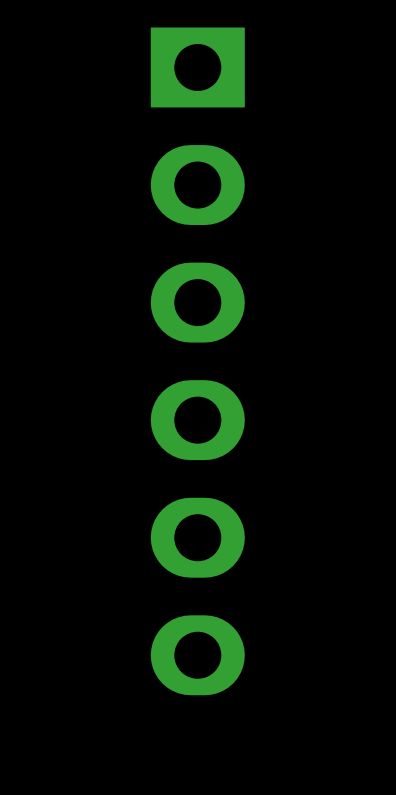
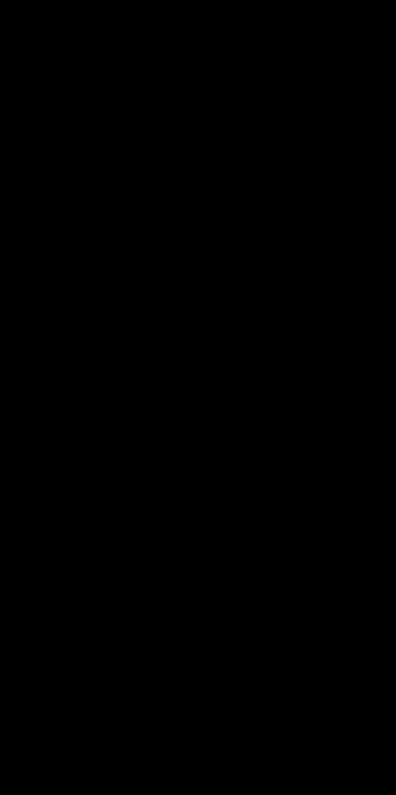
part: (197, 361) -> none

